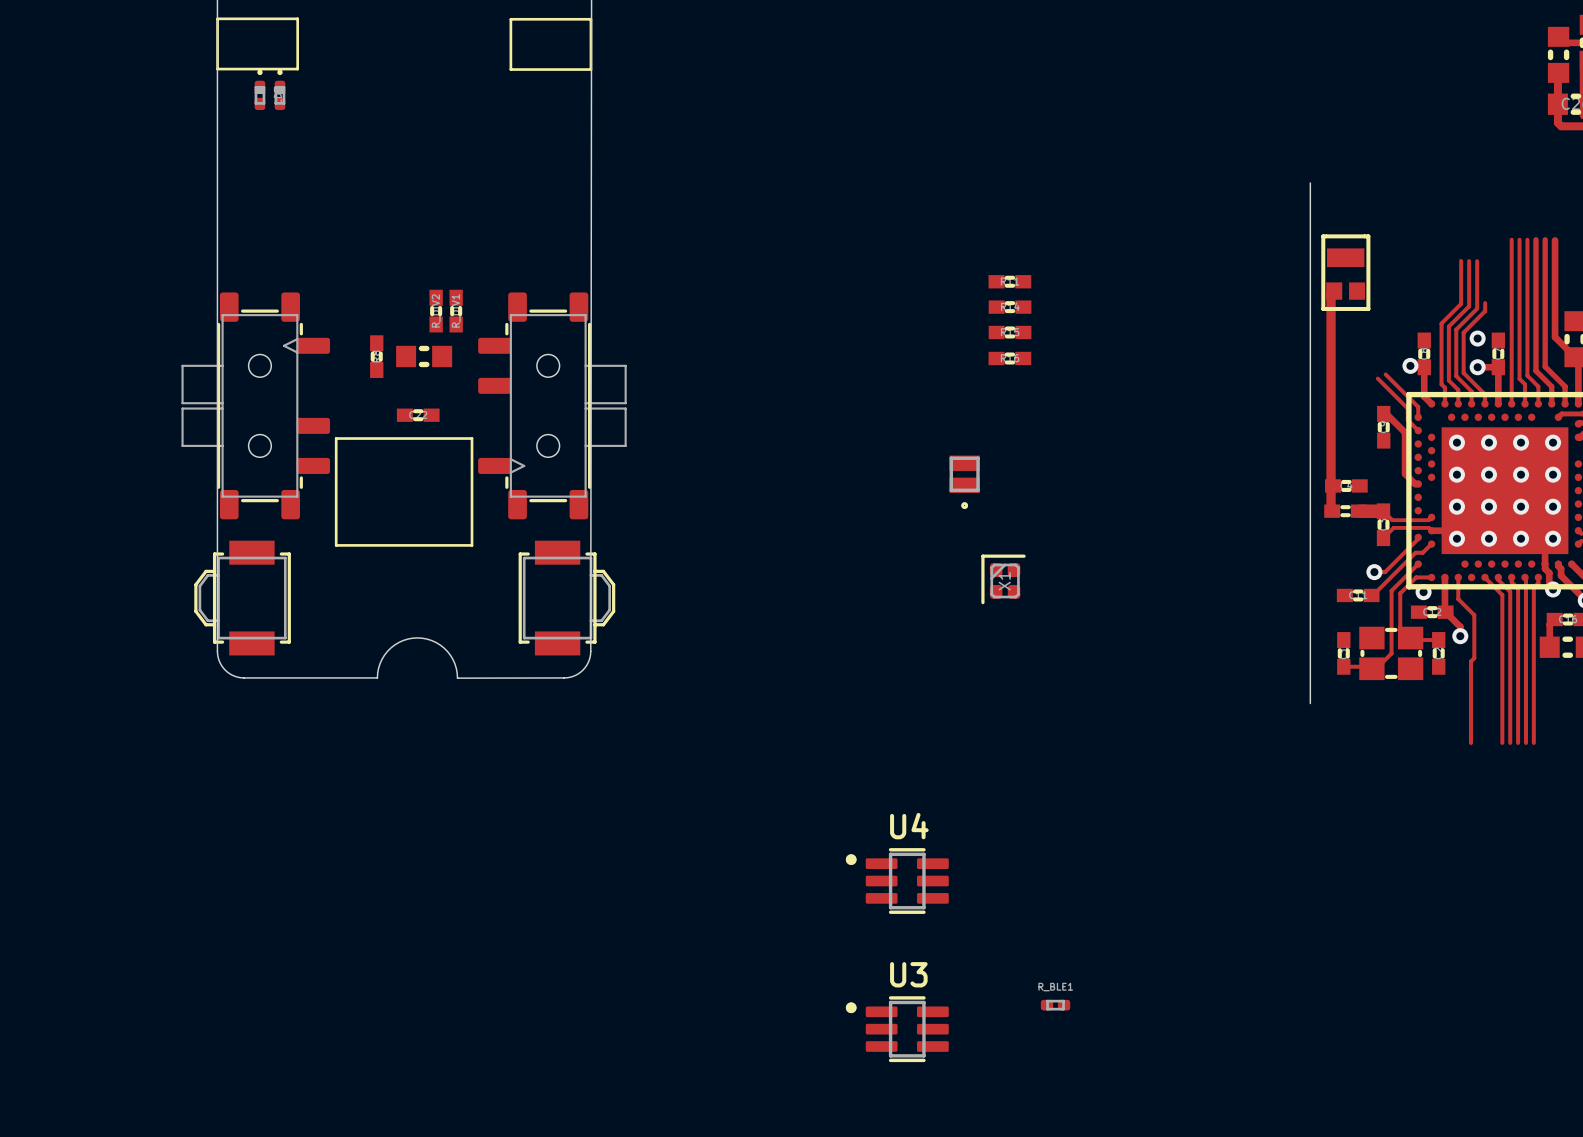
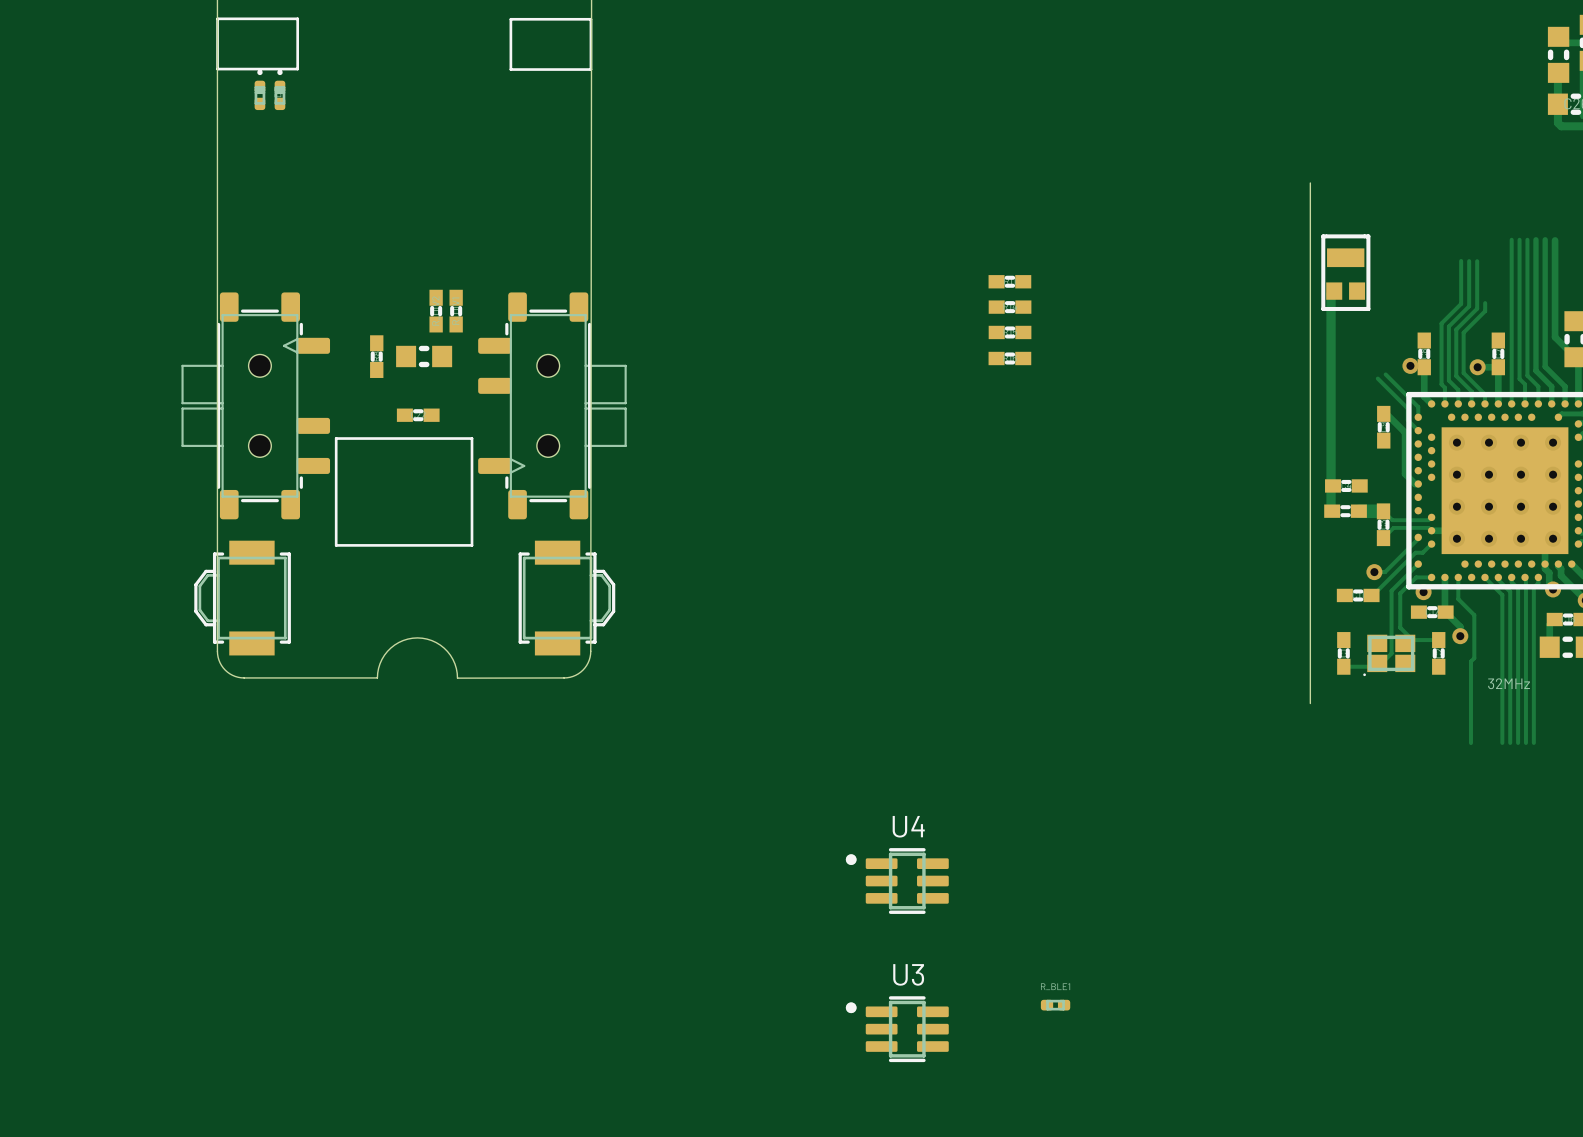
via: (1477, 338) -> none
part: (964, 482) -> none
X1: (1003, 579) -> none
part footprint: [1359, 626, 1424, 681] -> [1363, 634, 1416, 677]
part value: none -> 32MHz (1509, 683)

